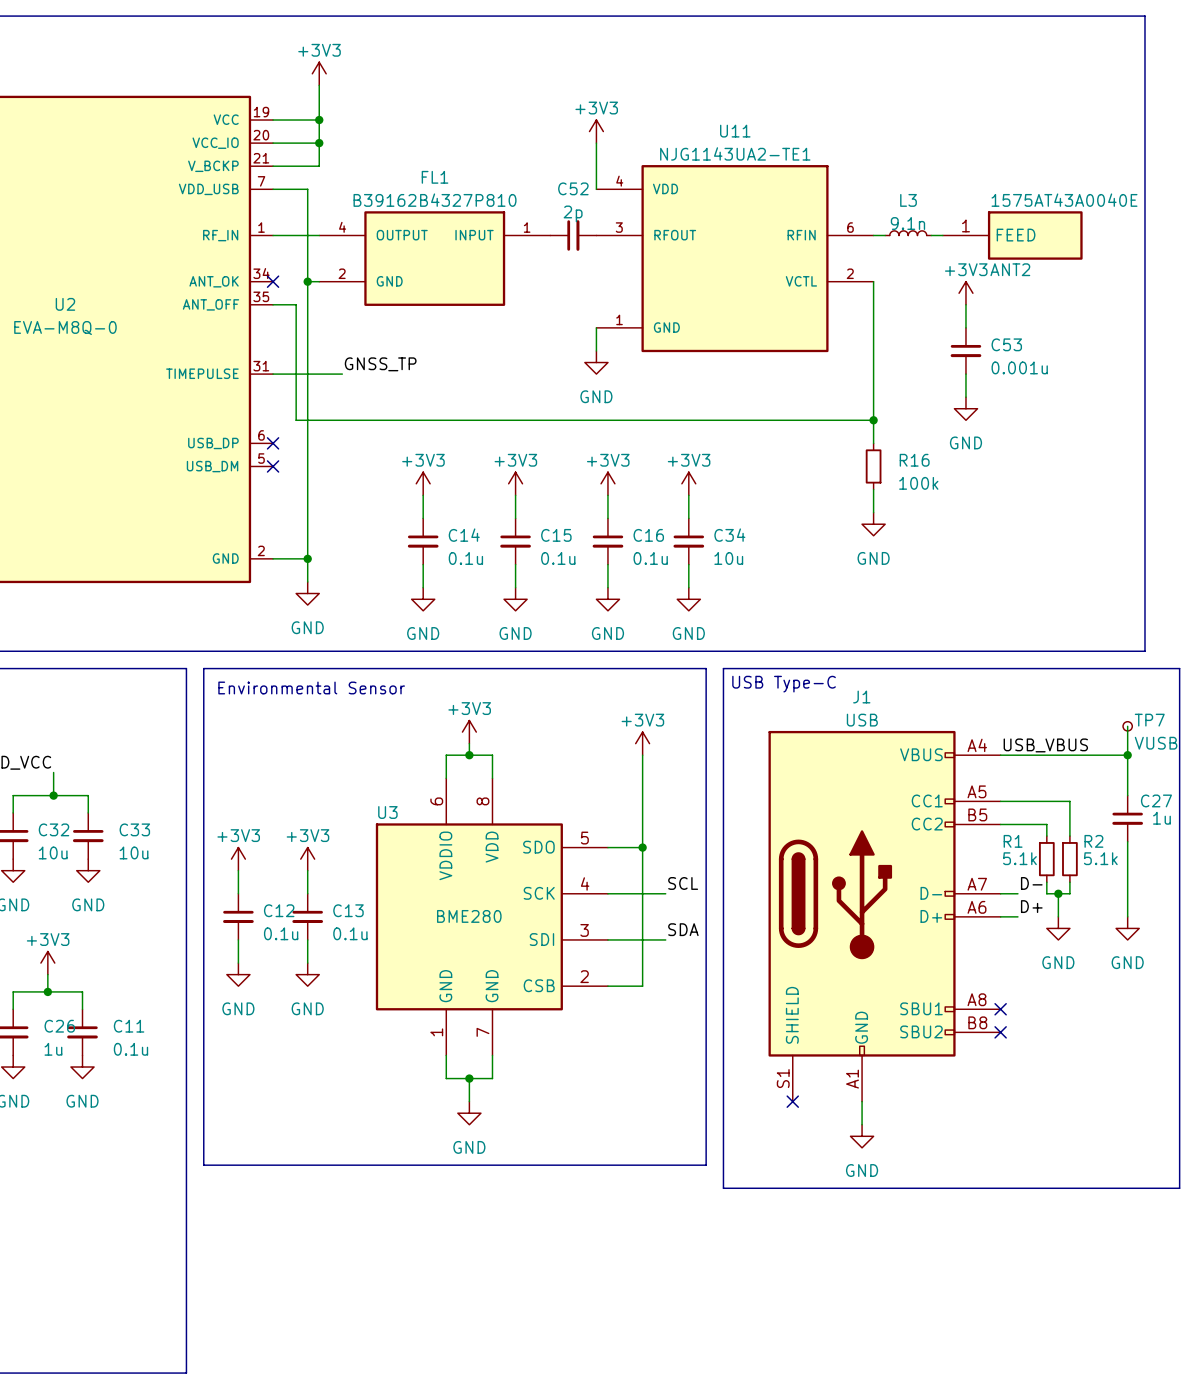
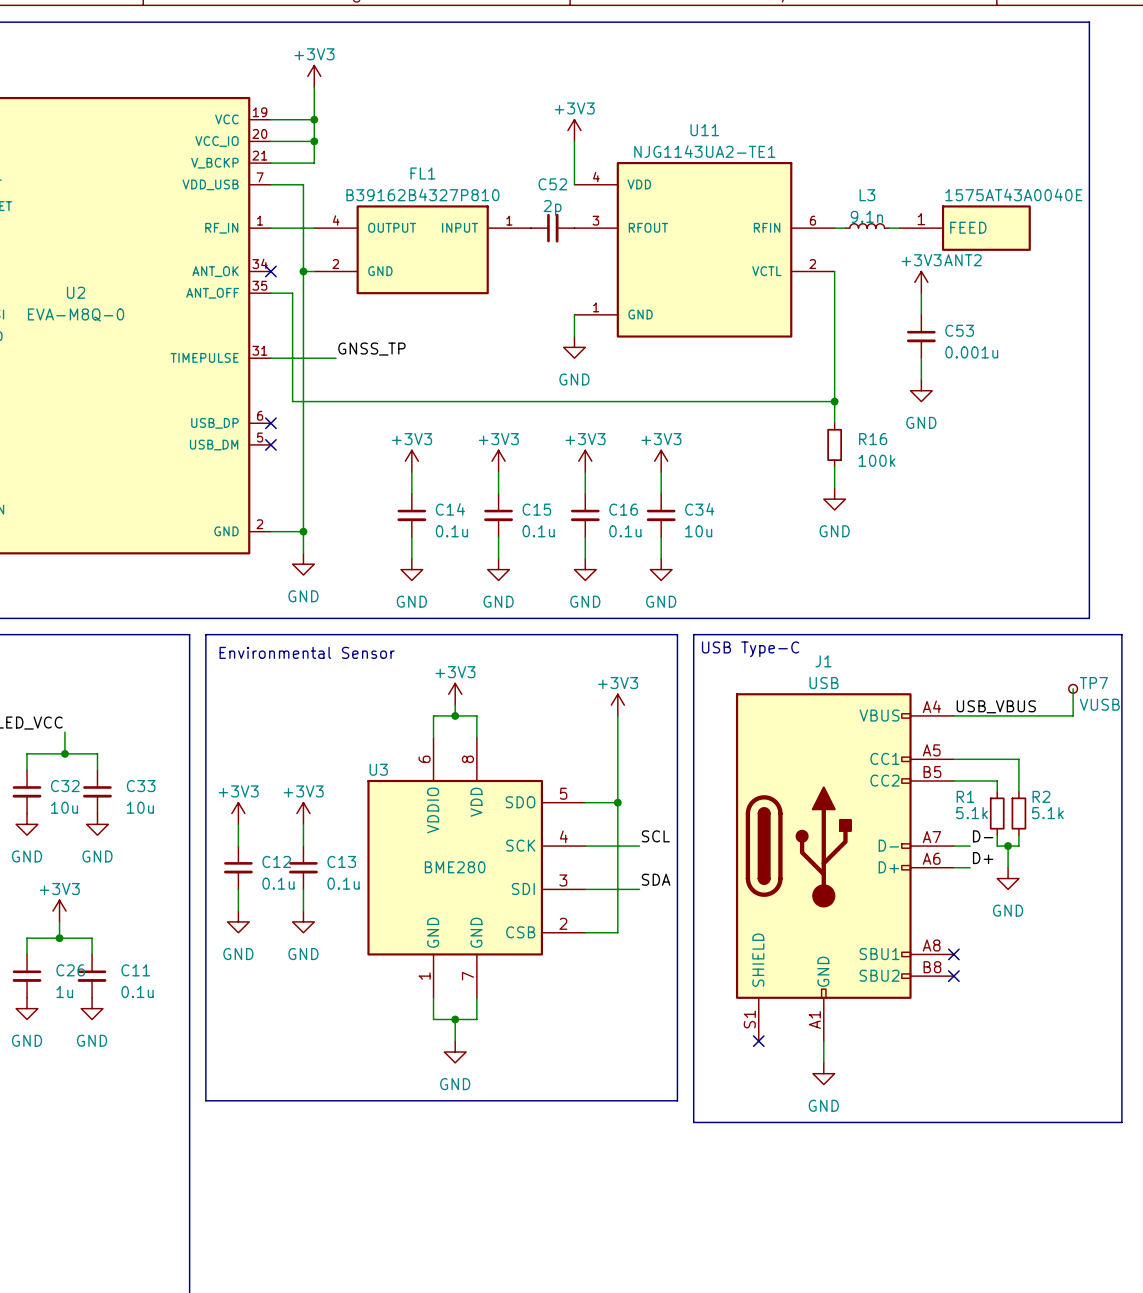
wire: (1127, 755) (1127, 795) -> none
junction: (1127, 755) -> none
C27: 1u (1127, 818) -> none
wire: (1127, 841) (1127, 916) -> none
power symbol: GND (1127, 928) -> none

